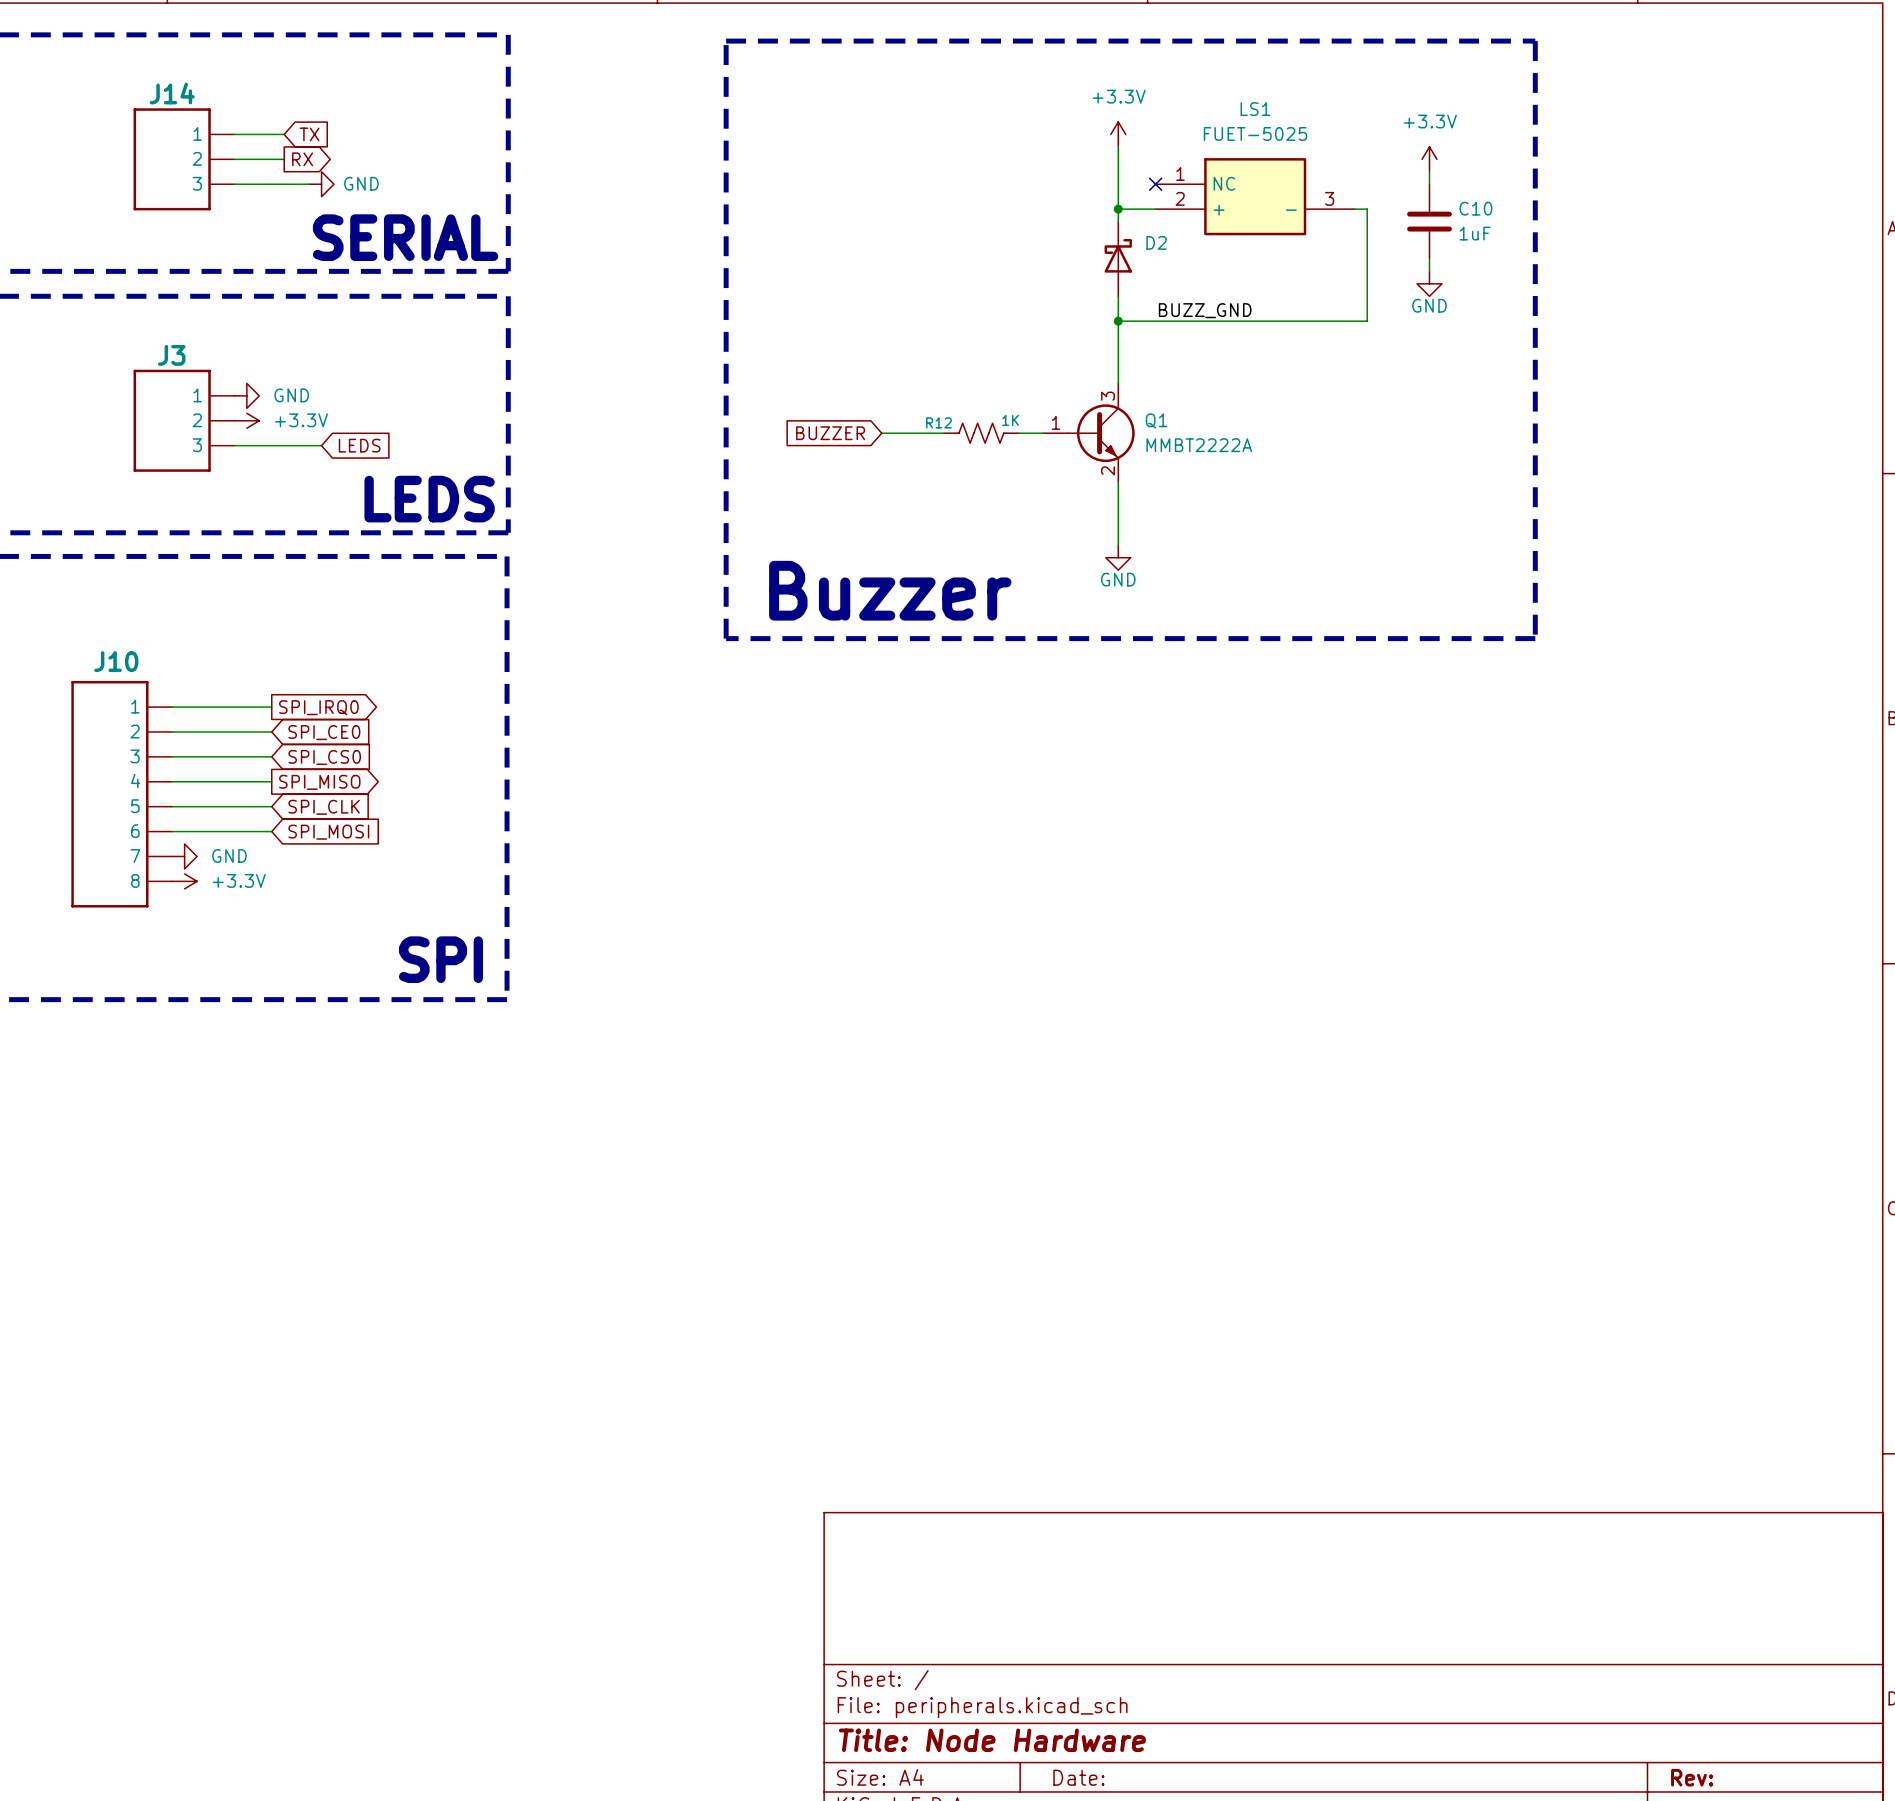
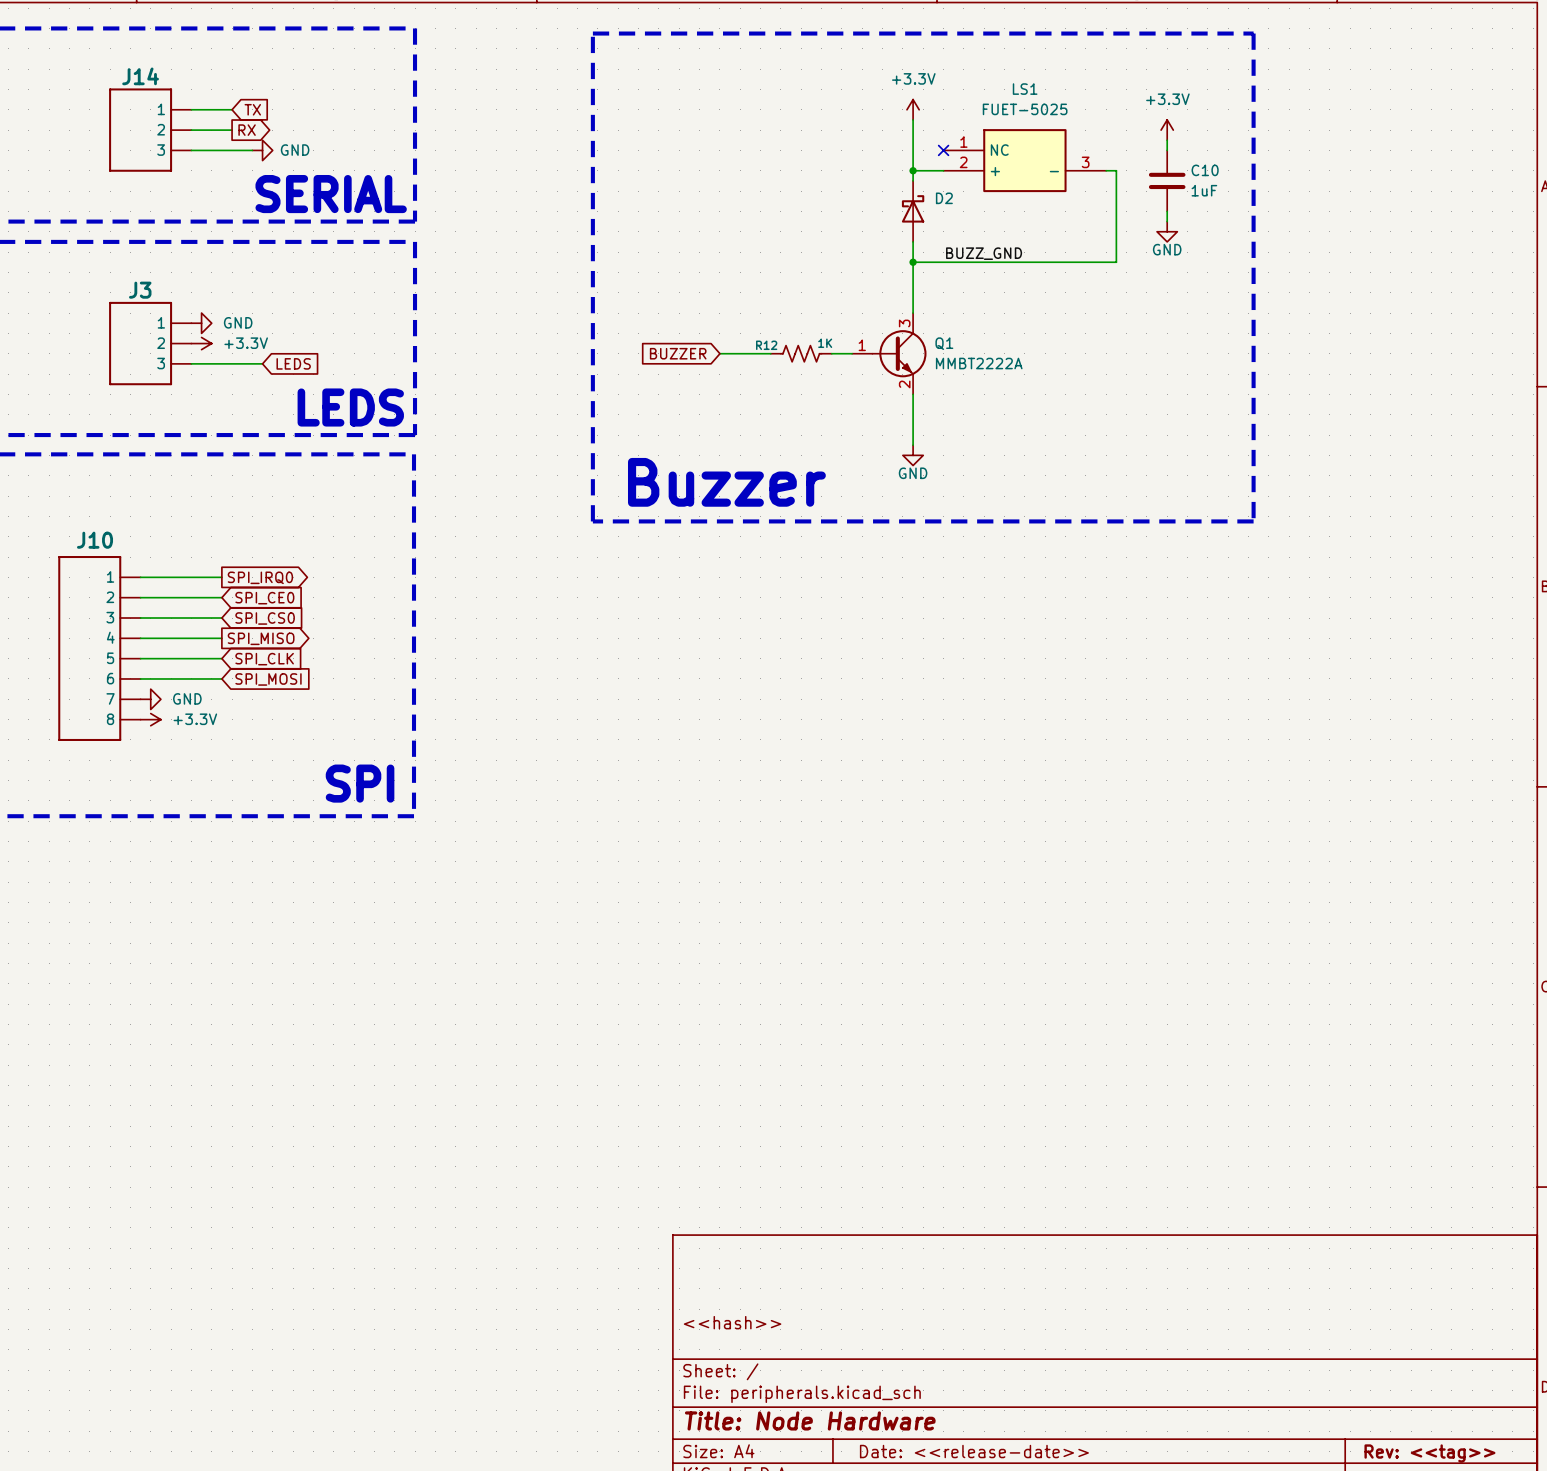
title block: none -> <<hash>> (732, 1322)
title block: Date: (1078, 1777) -> Date: <<release-date>> (974, 1451)
title block: Rev: (1692, 1777) -> Rev: <<tag>> (1429, 1453)

